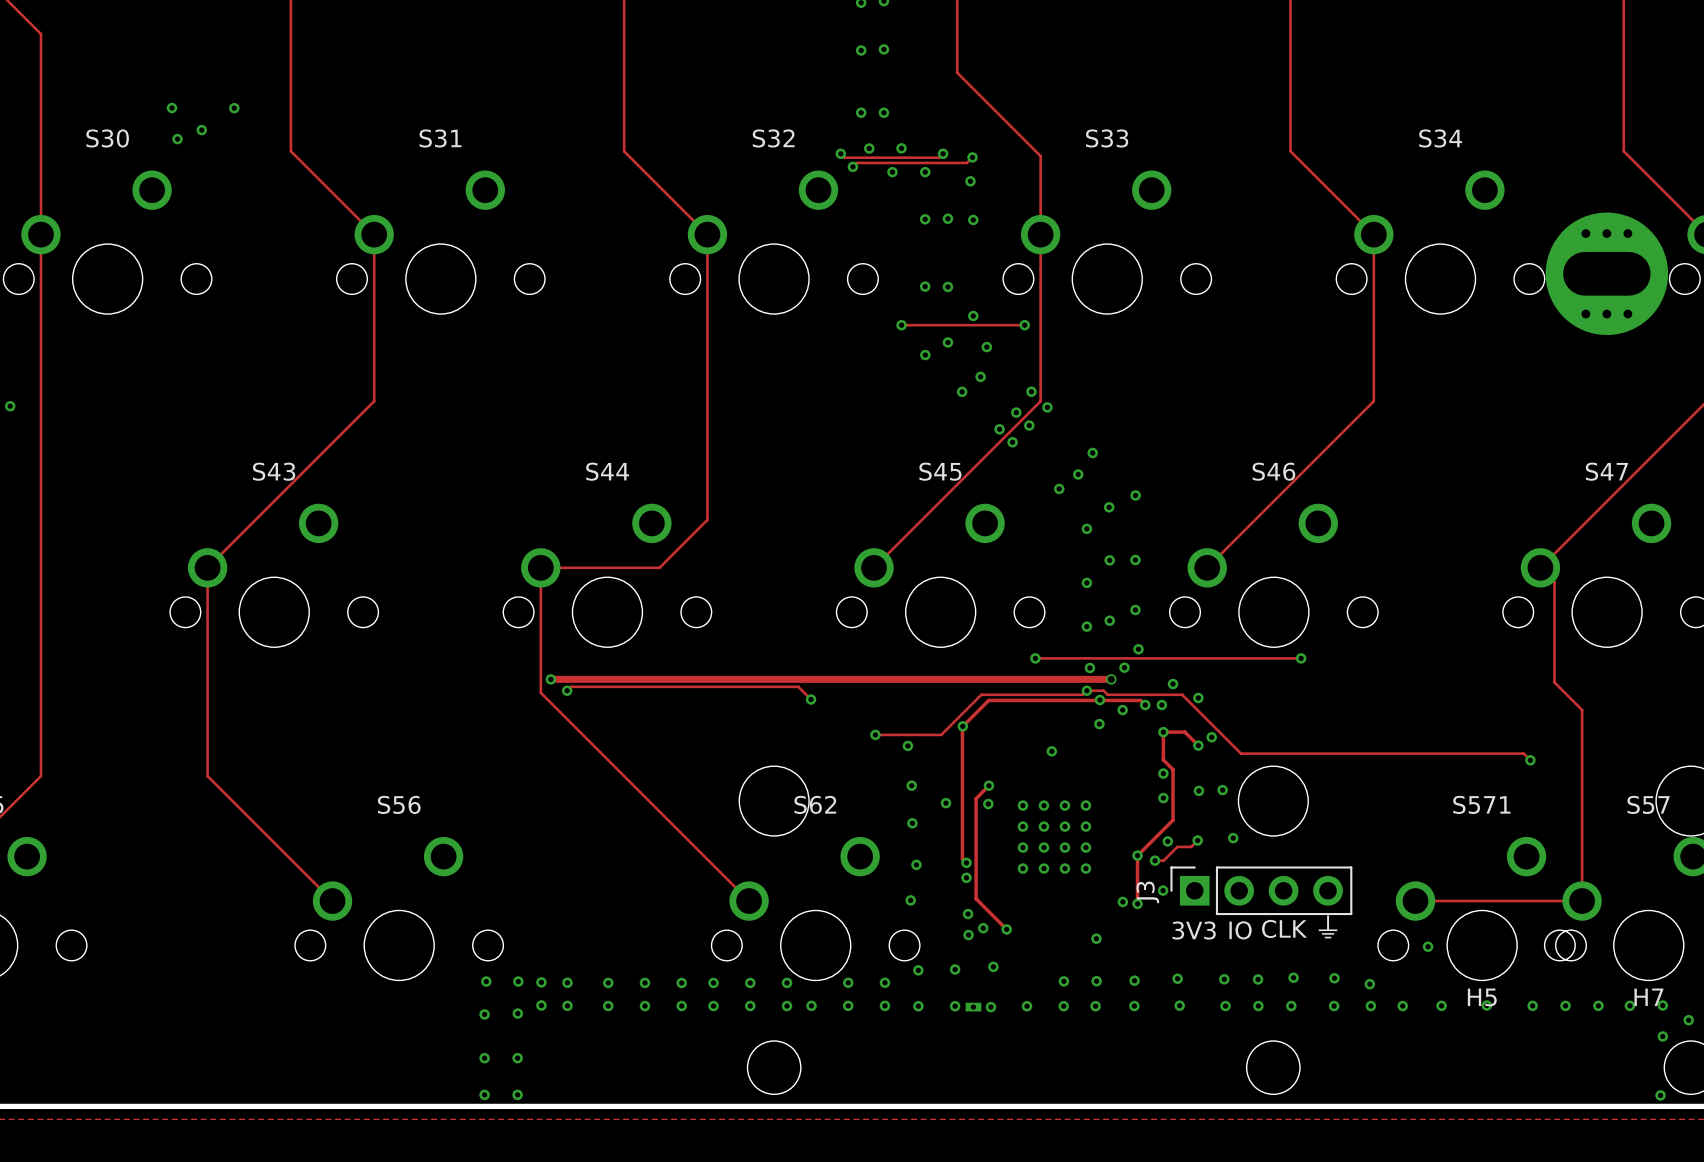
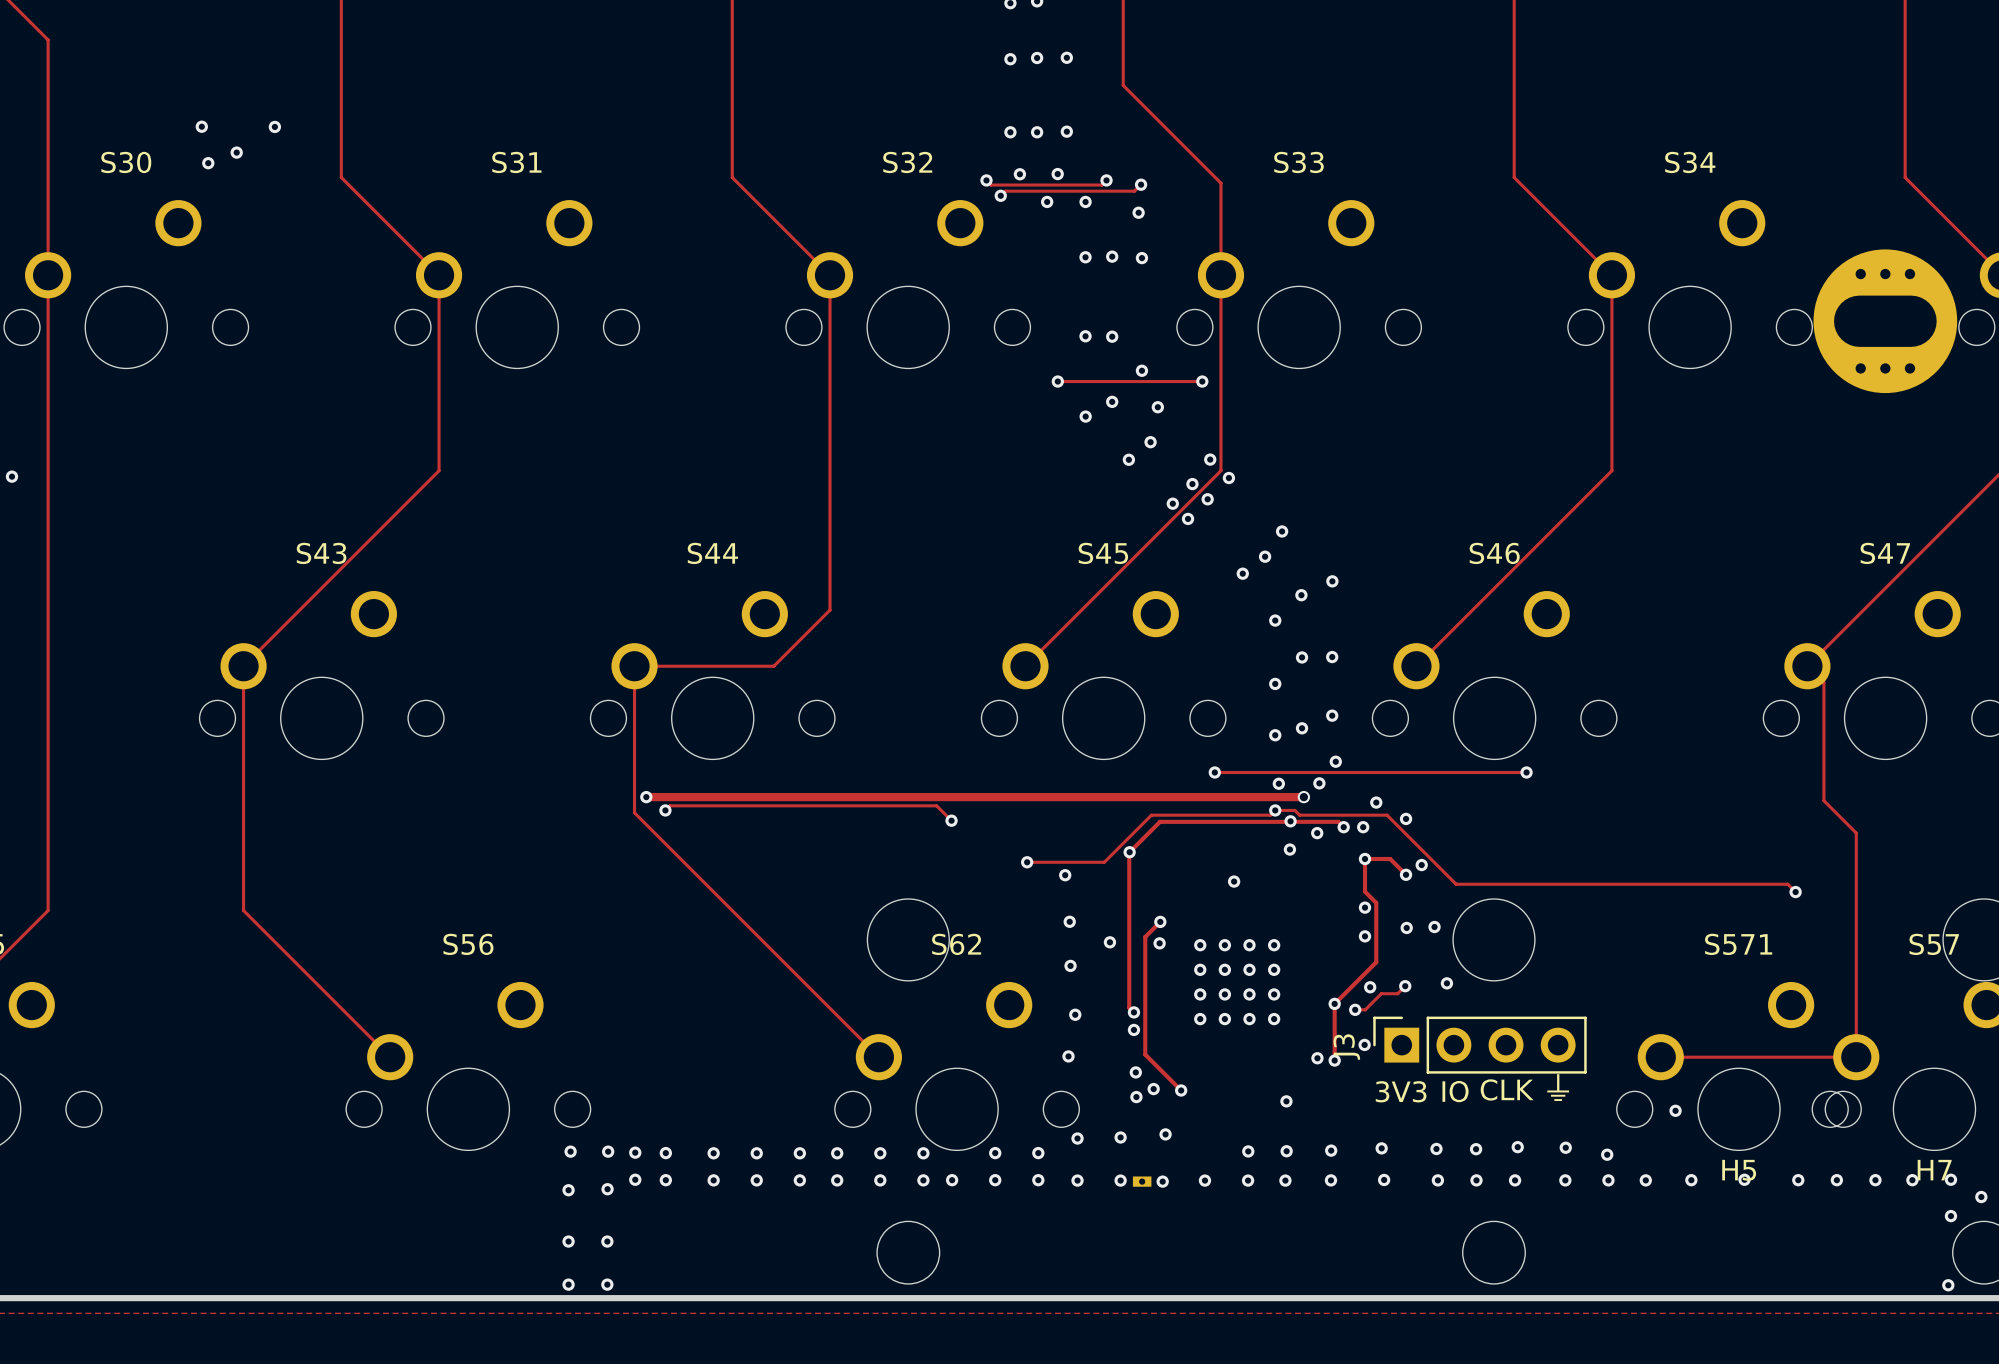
via: none -> (1066, 57)
via: none -> (1066, 131)

